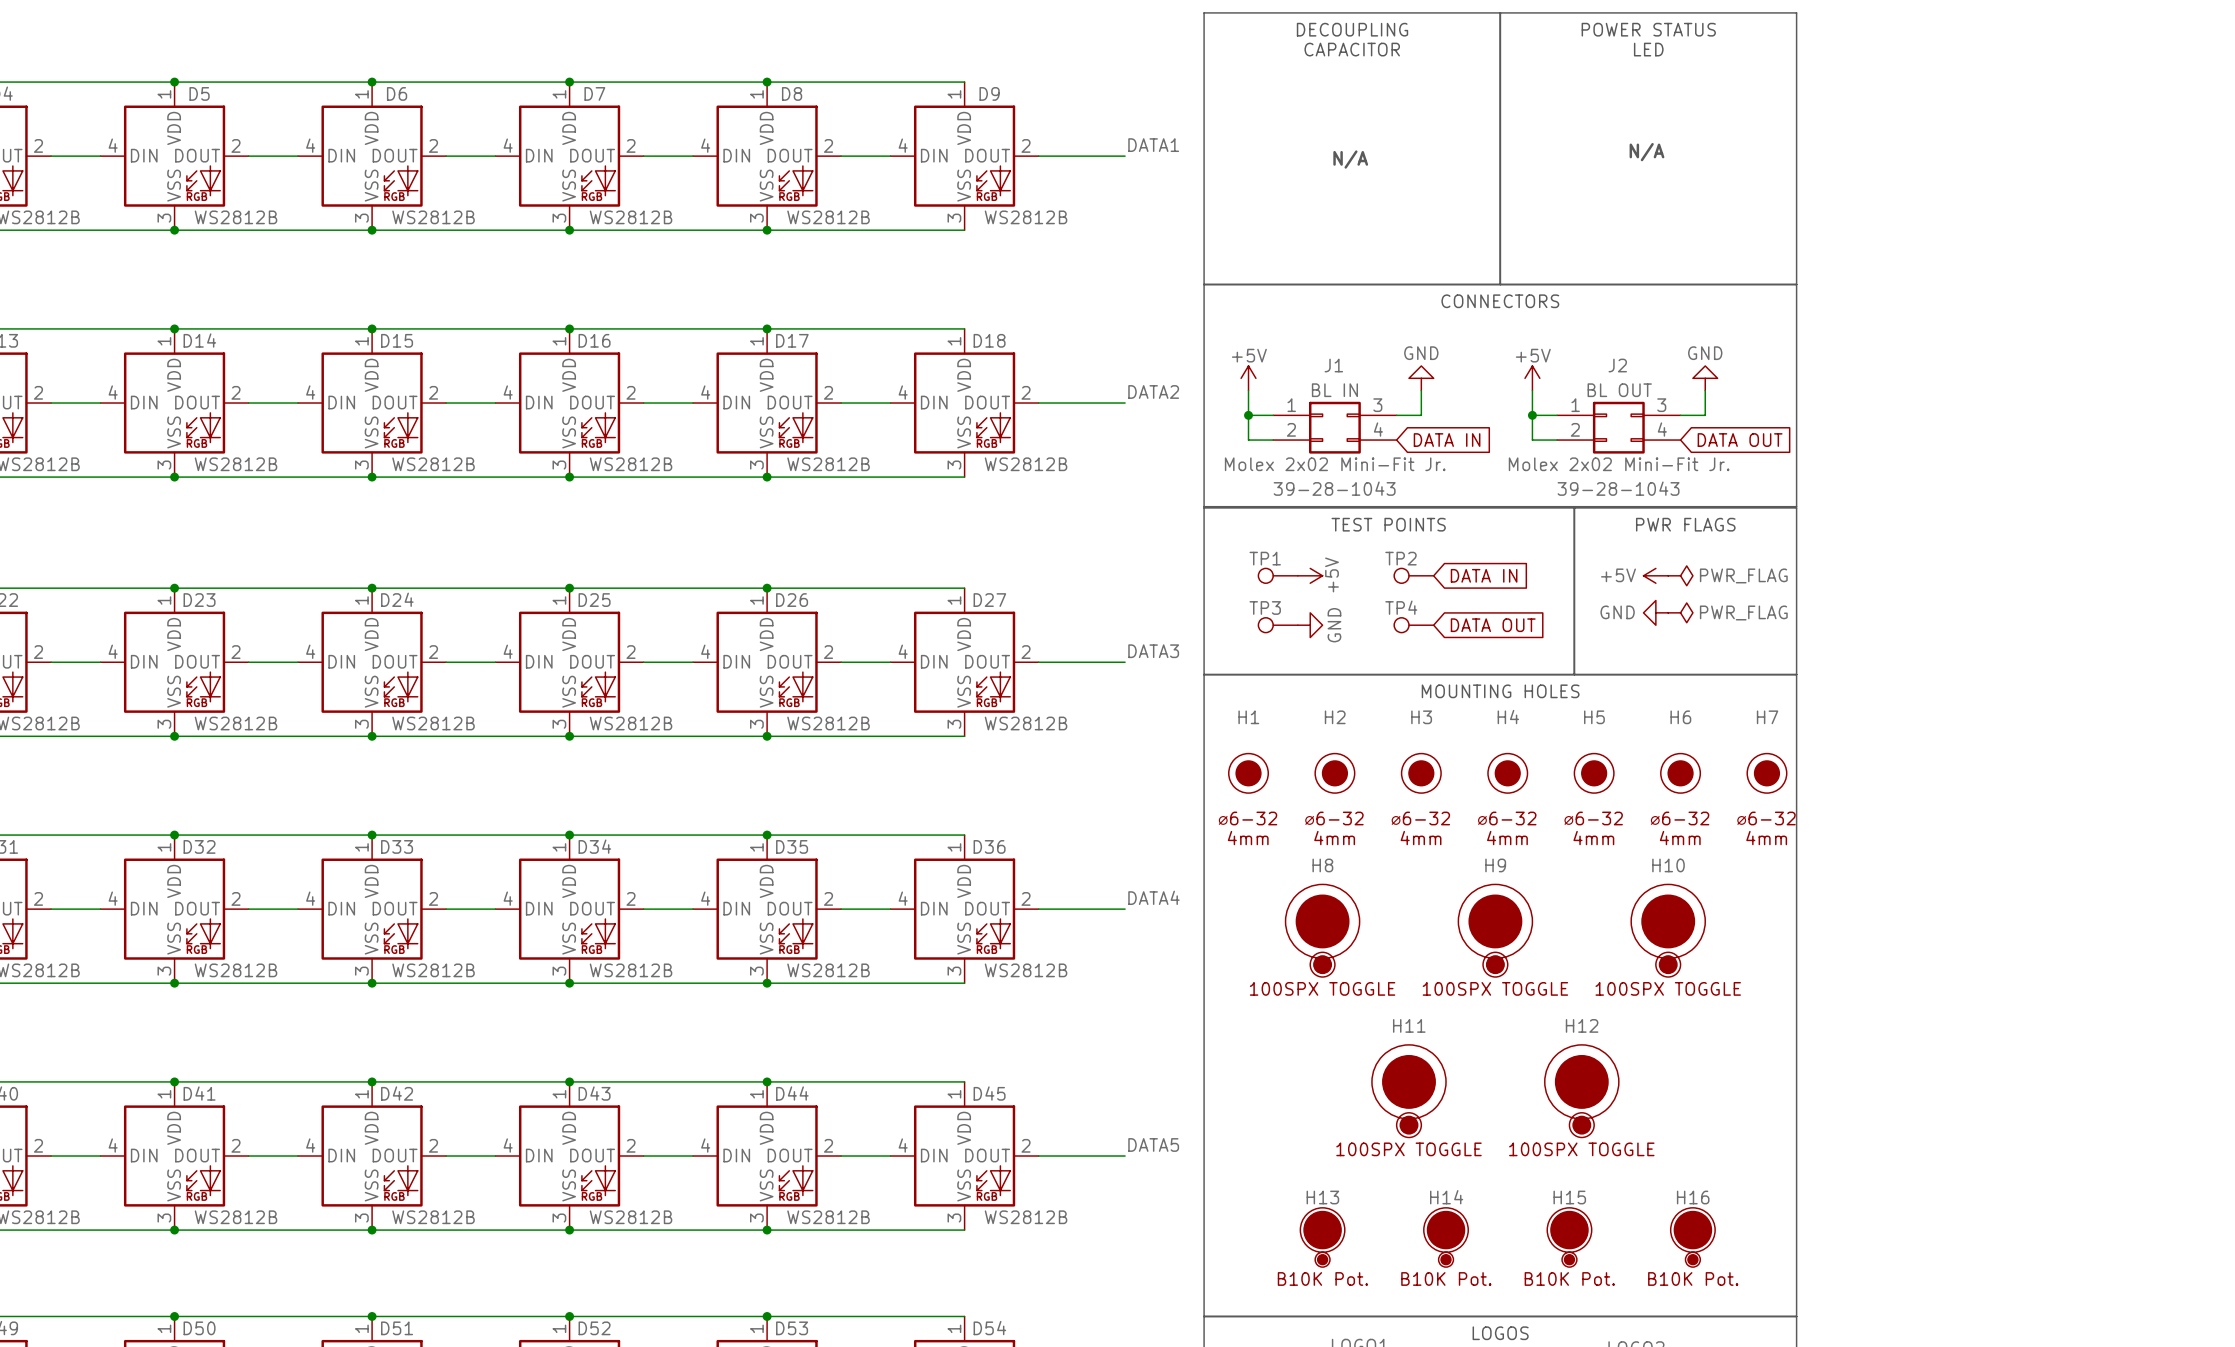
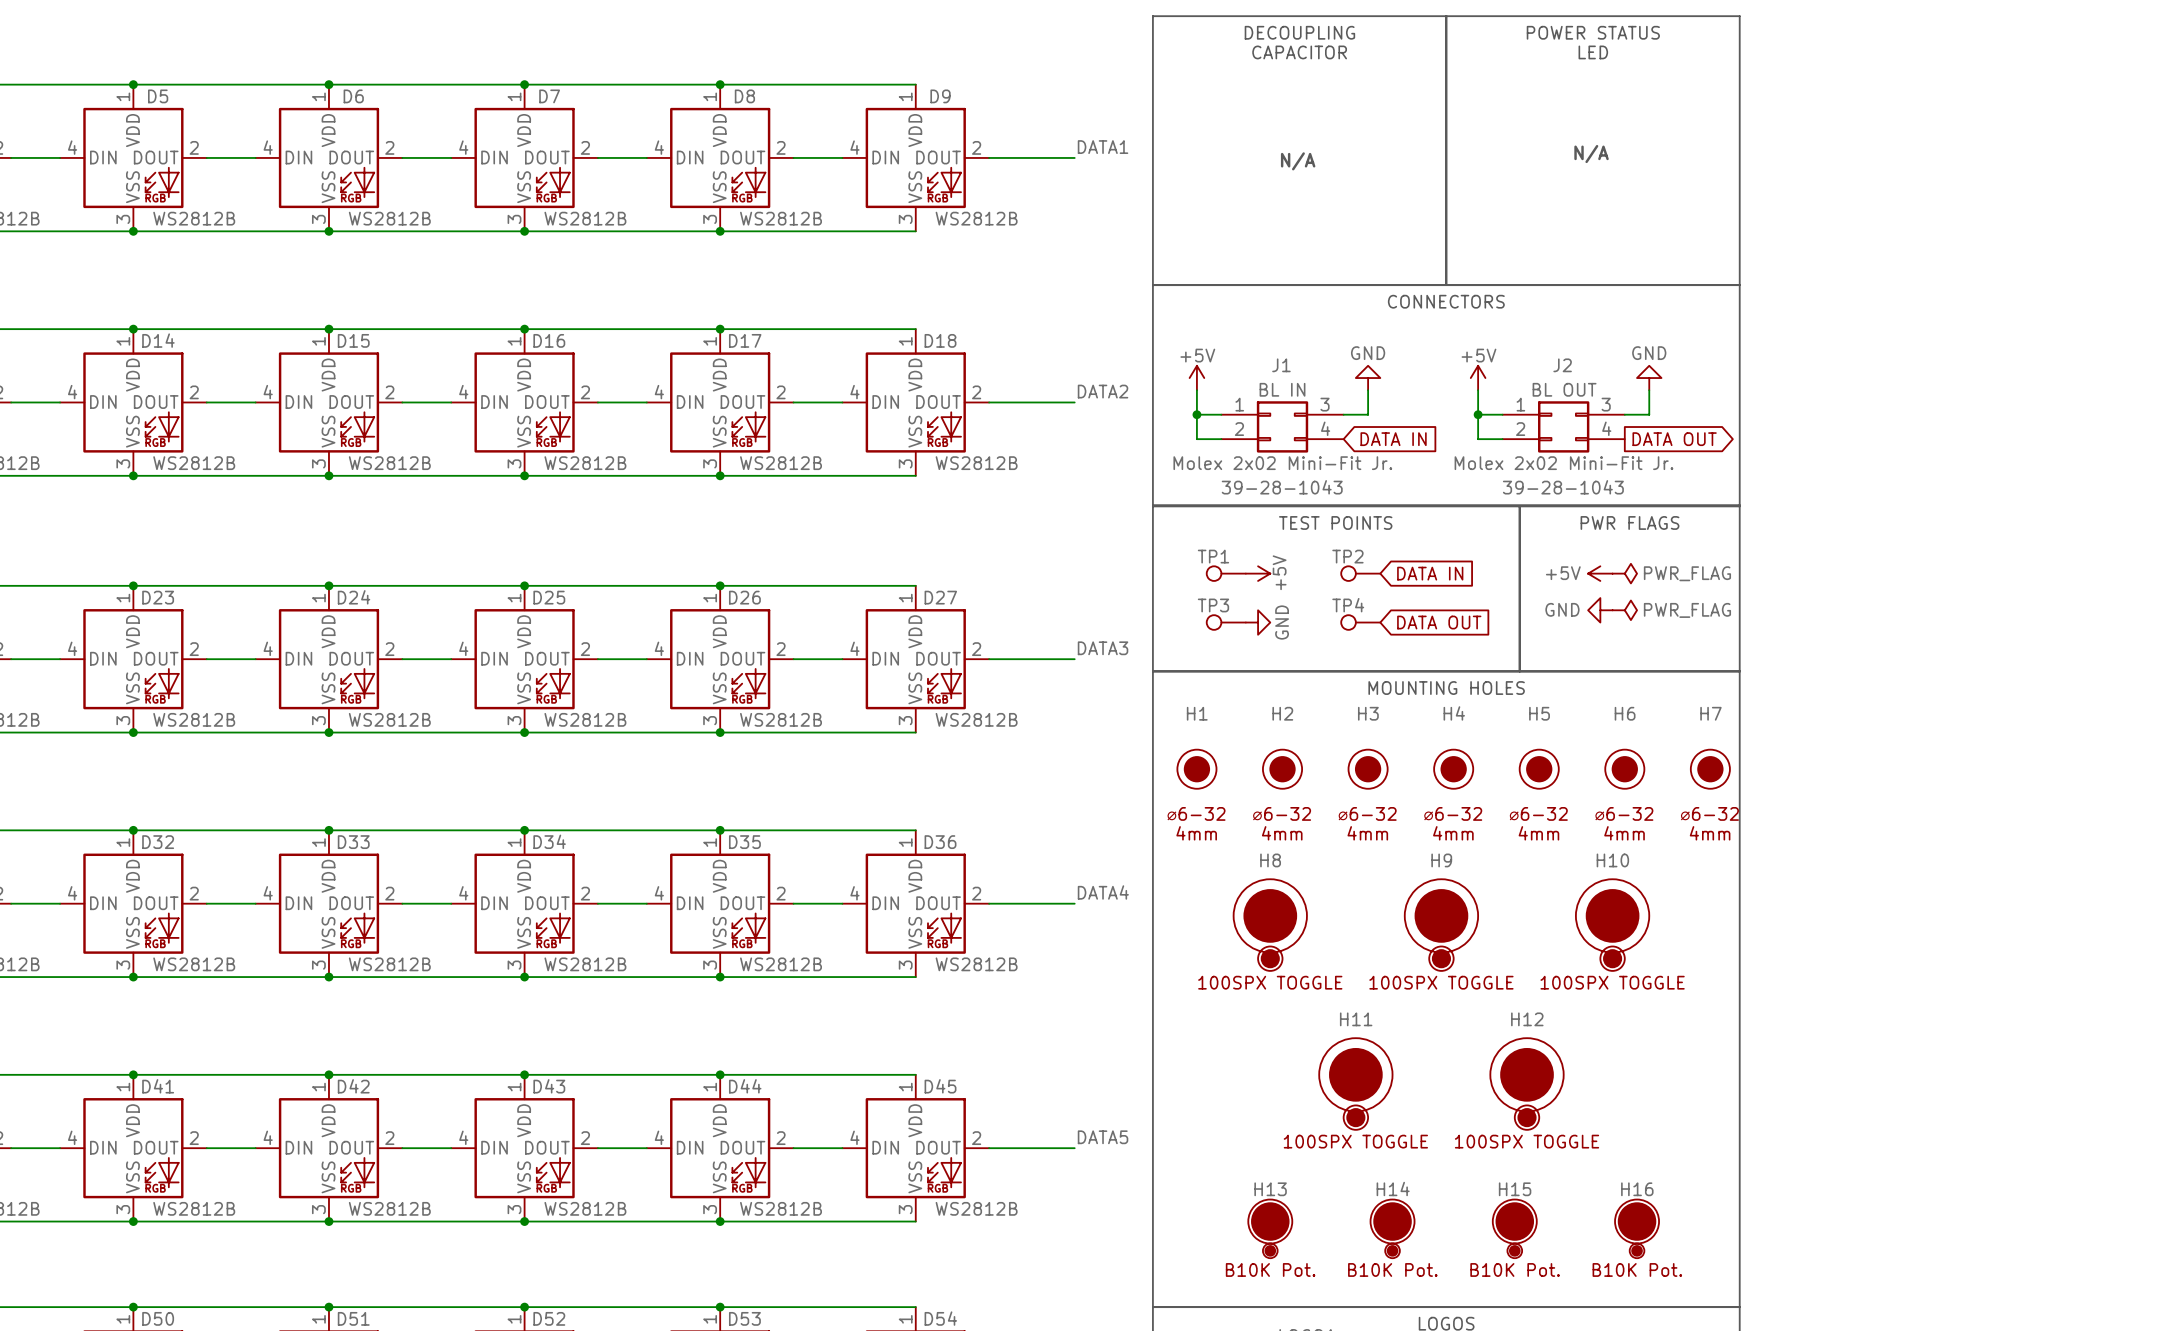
global label shape: input (1740, 440) -> output (1674, 439)

